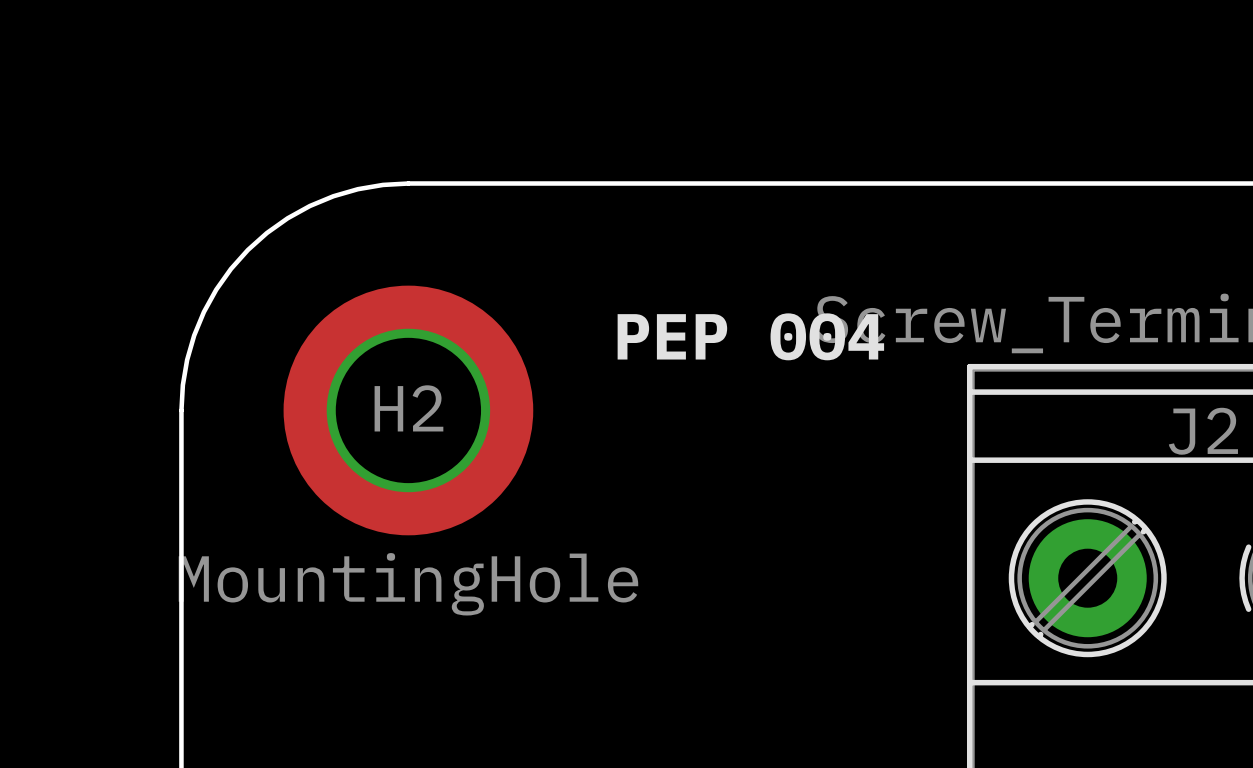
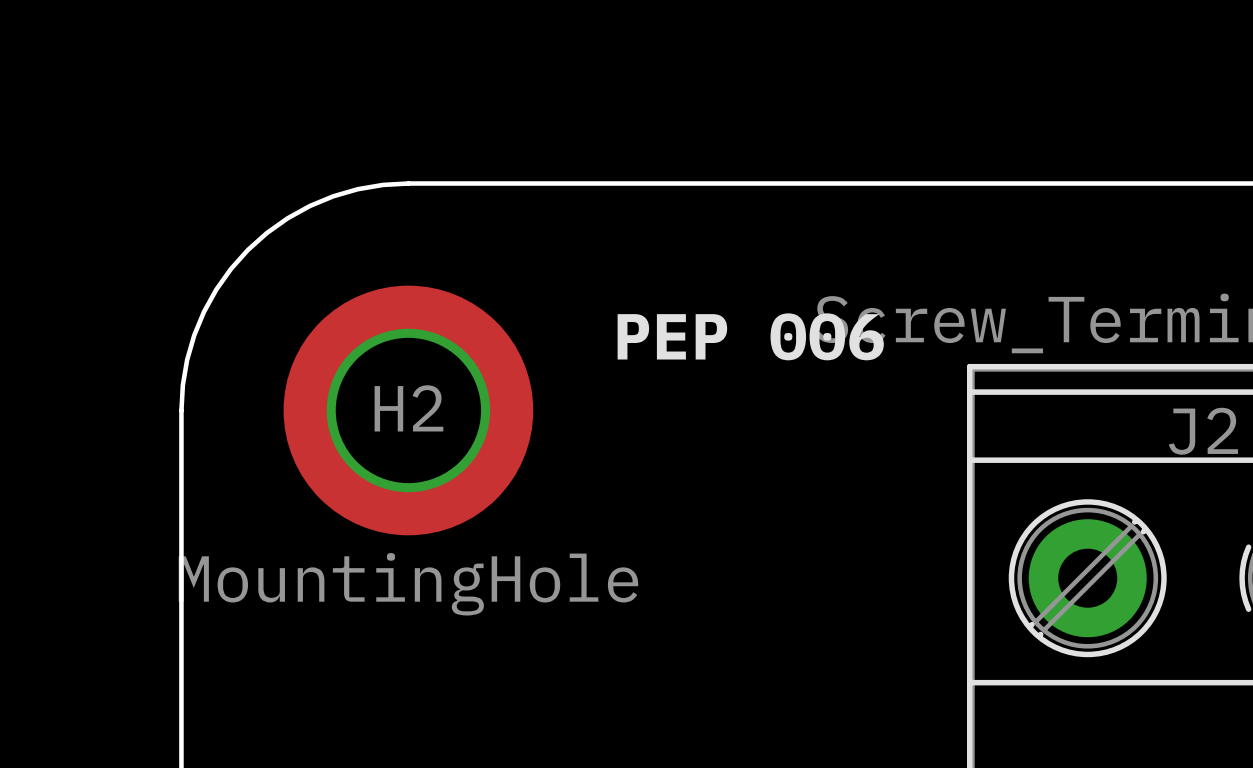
text: PEP 004 (750, 336) -> PEP 006 (750, 336)

